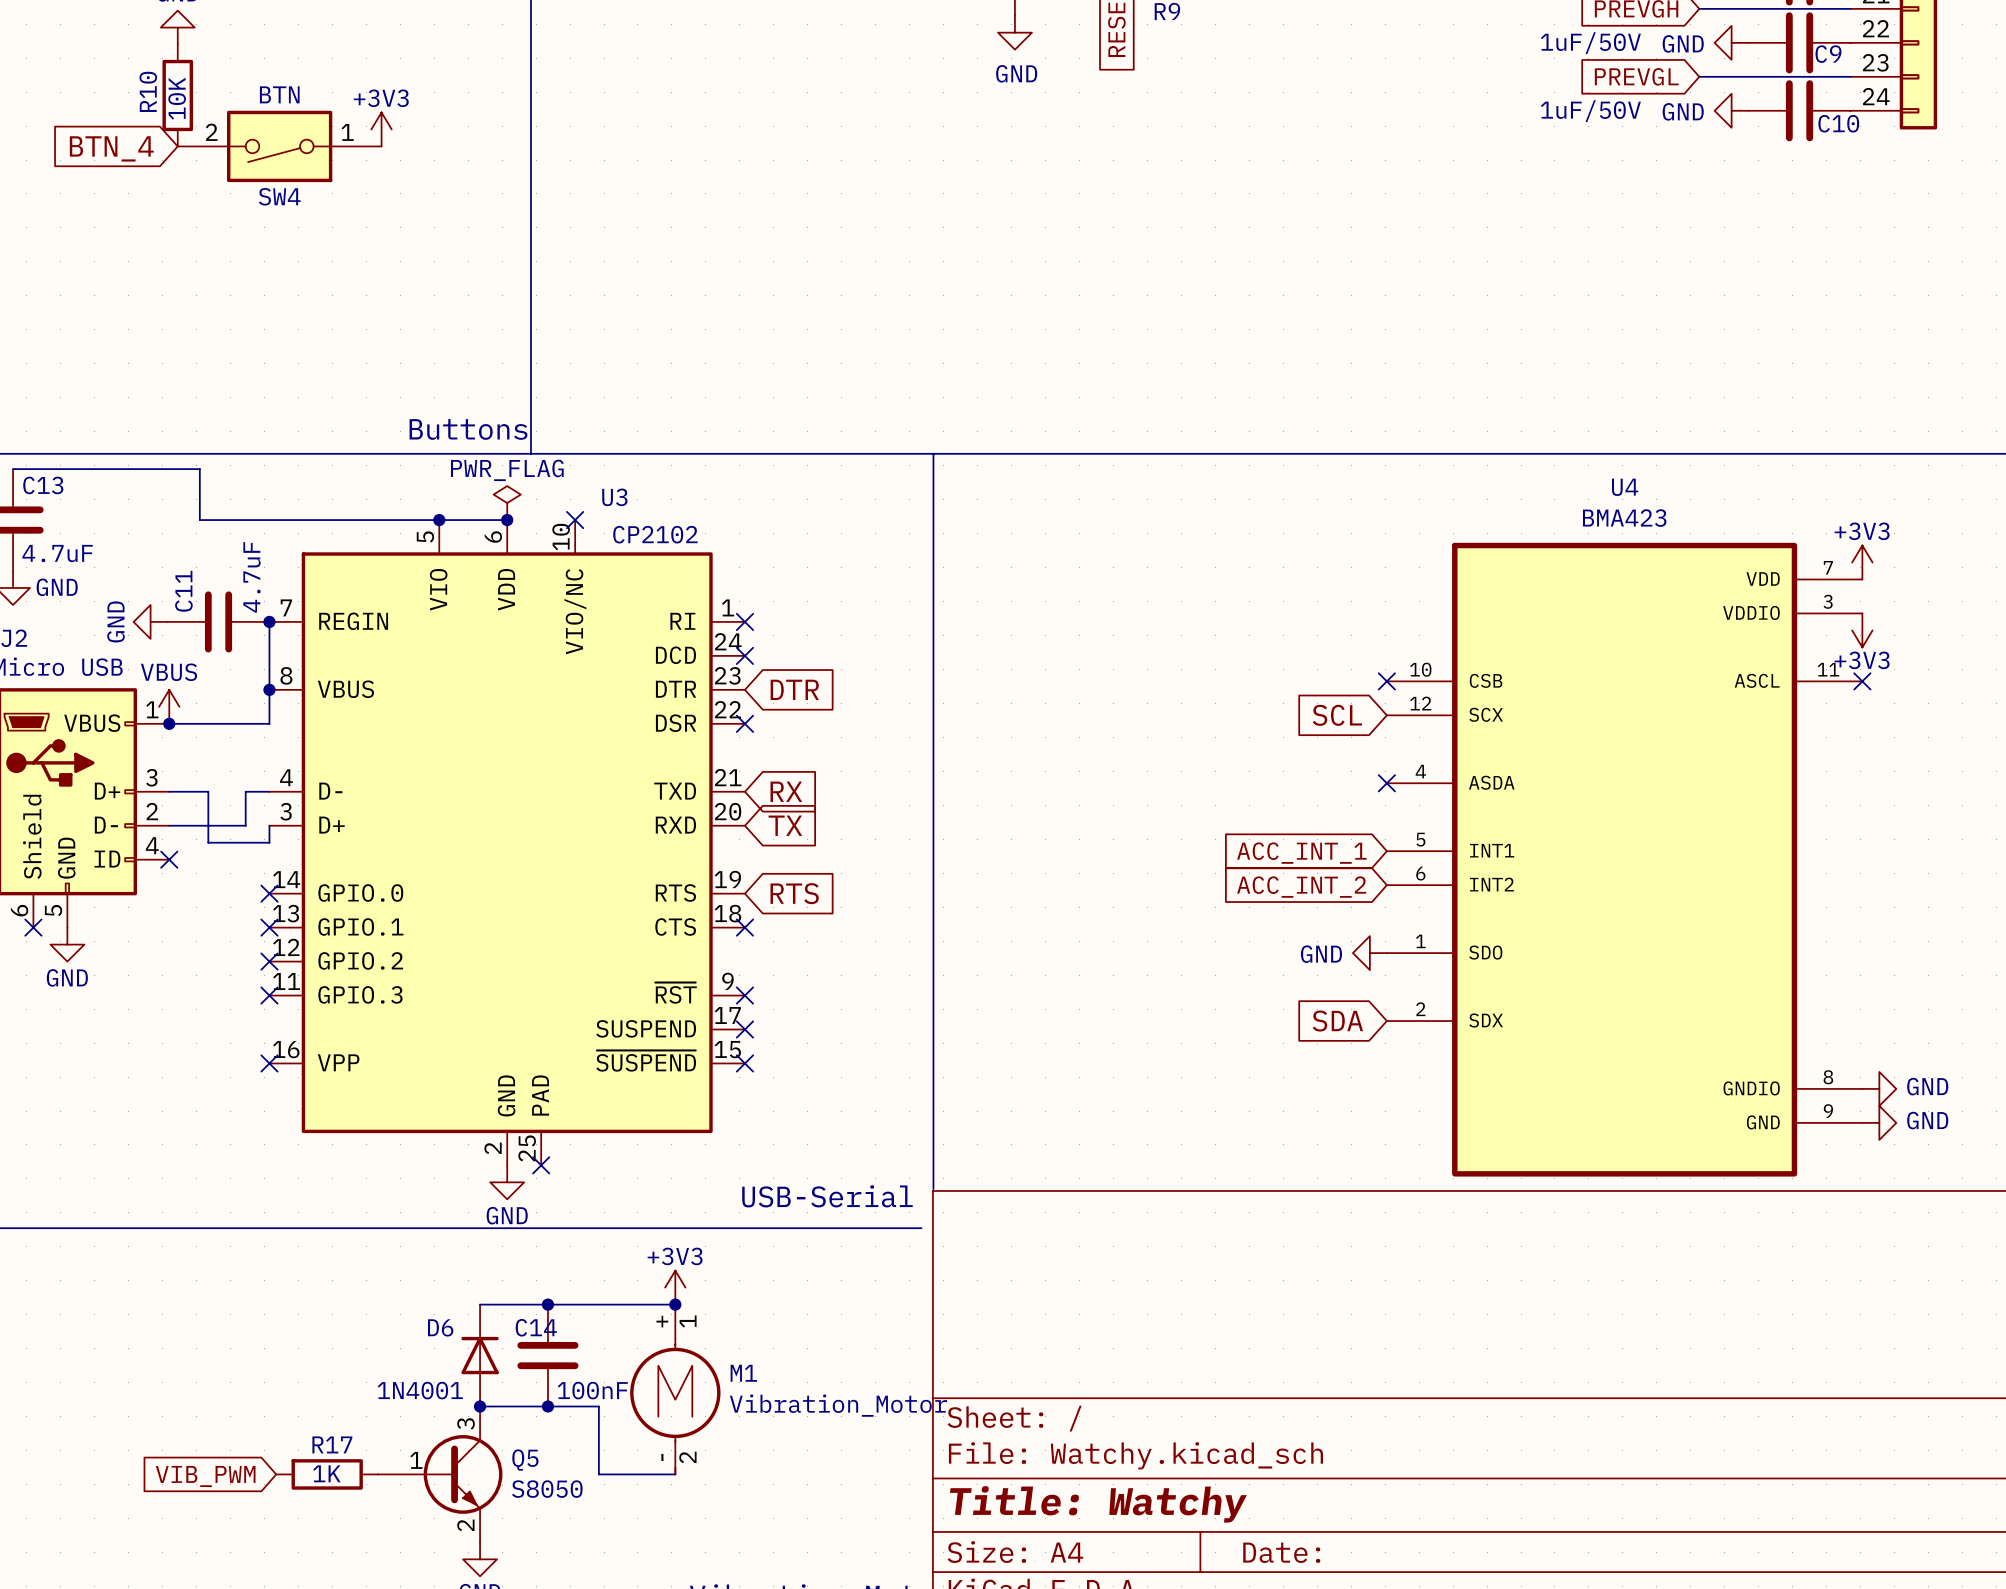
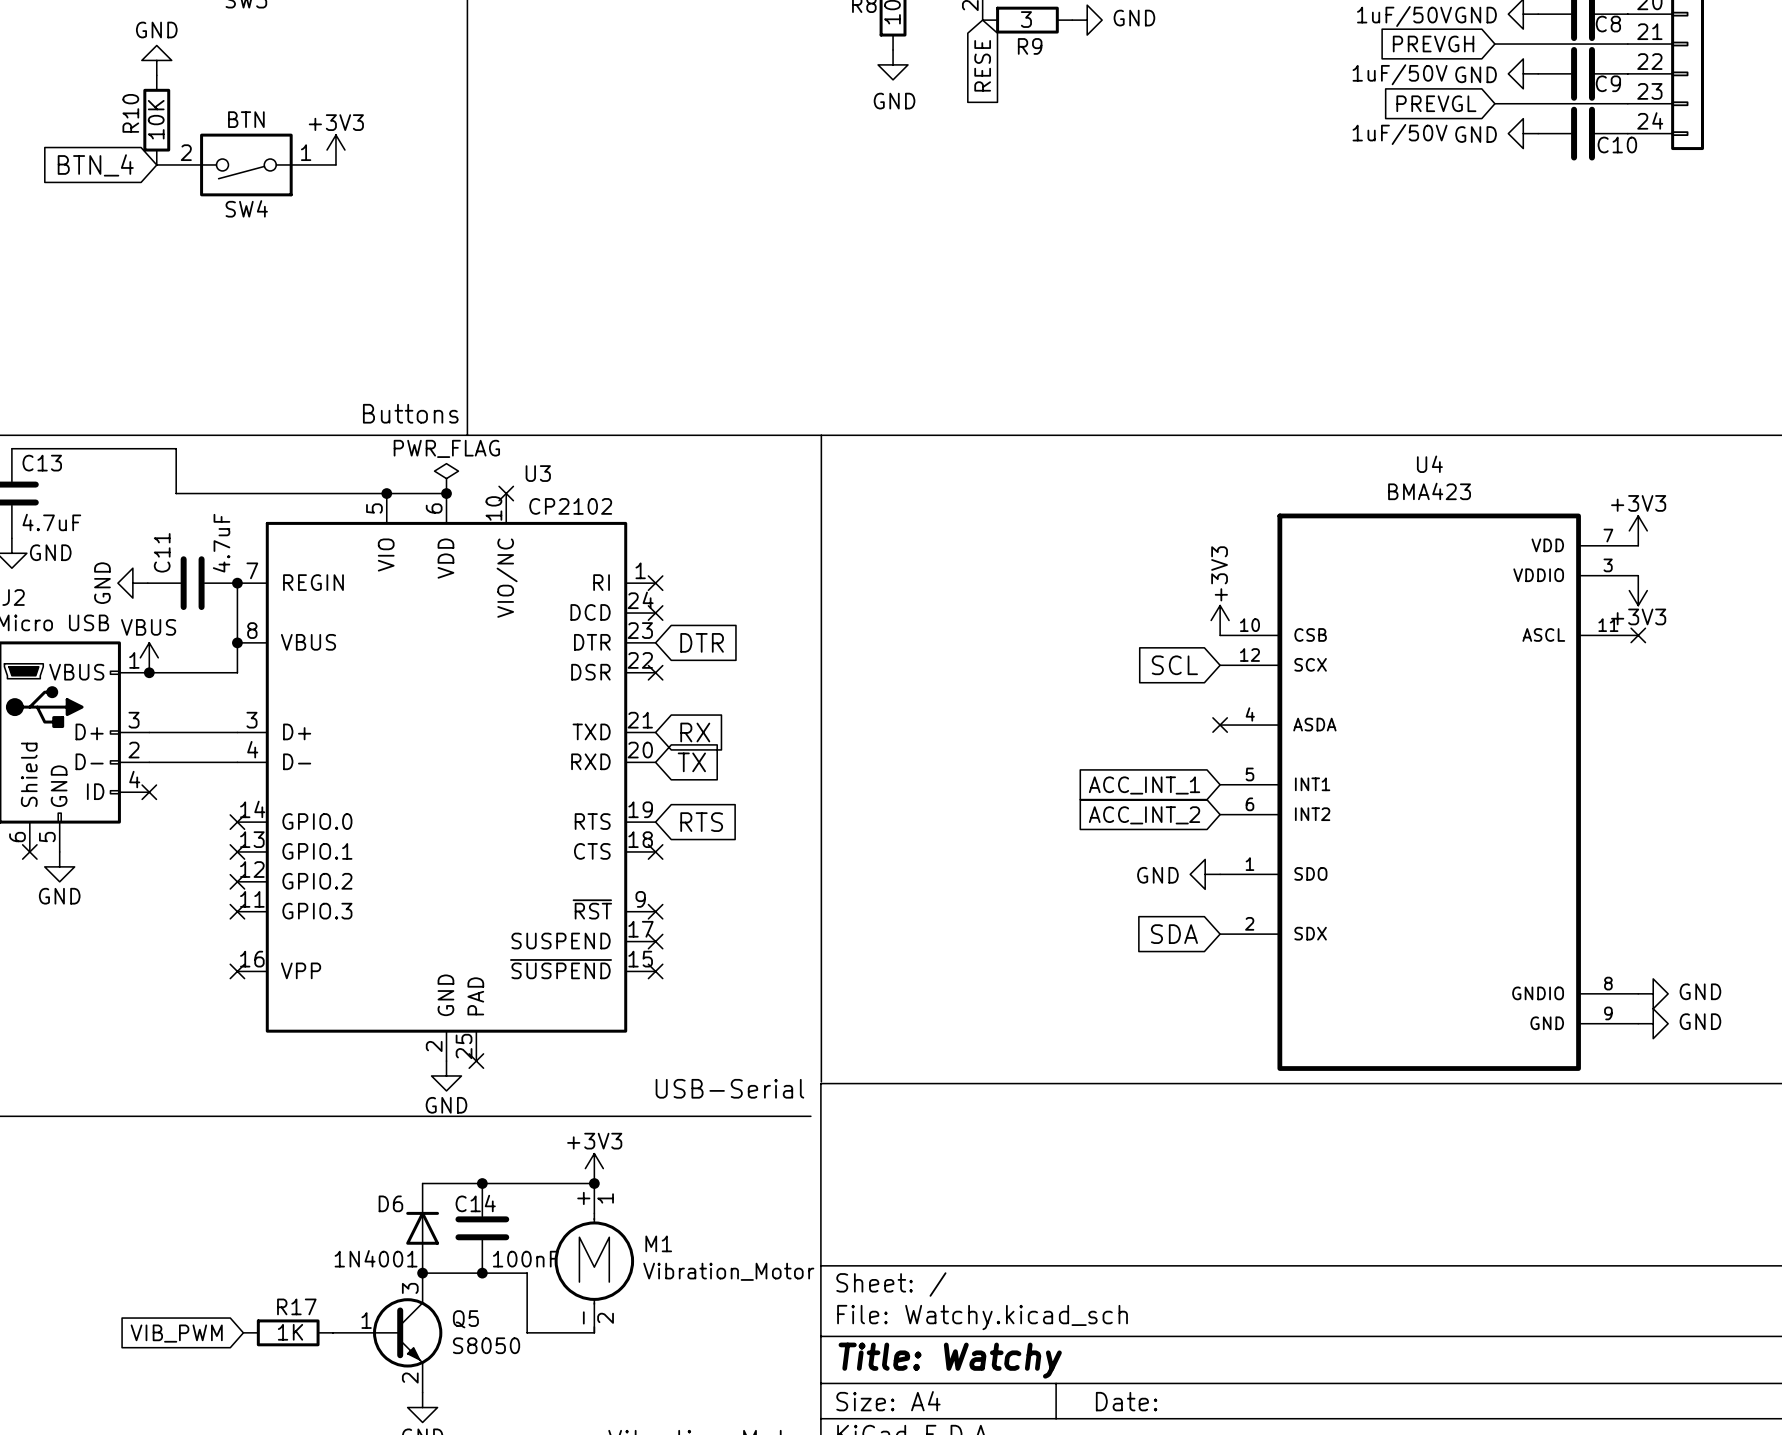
power symbol: none -> +3V3 (1220, 620)
no-connect mark: (1386, 681) -> none
U3 pin number: 4 (286, 777) -> 3 (251, 720)
wire: (208, 791) (208, 842) (269, 842) (269, 825) -> (183, 732) (216, 732)
wire: (245, 791) (245, 825) -> (237, 762) (216, 762)
U3 pin name: D- (330, 791) -> D+ (297, 731)
U3 pin number: 3 (286, 811) -> 4 (252, 749)
U3 pin name: D+ (332, 825) -> D- (297, 761)

